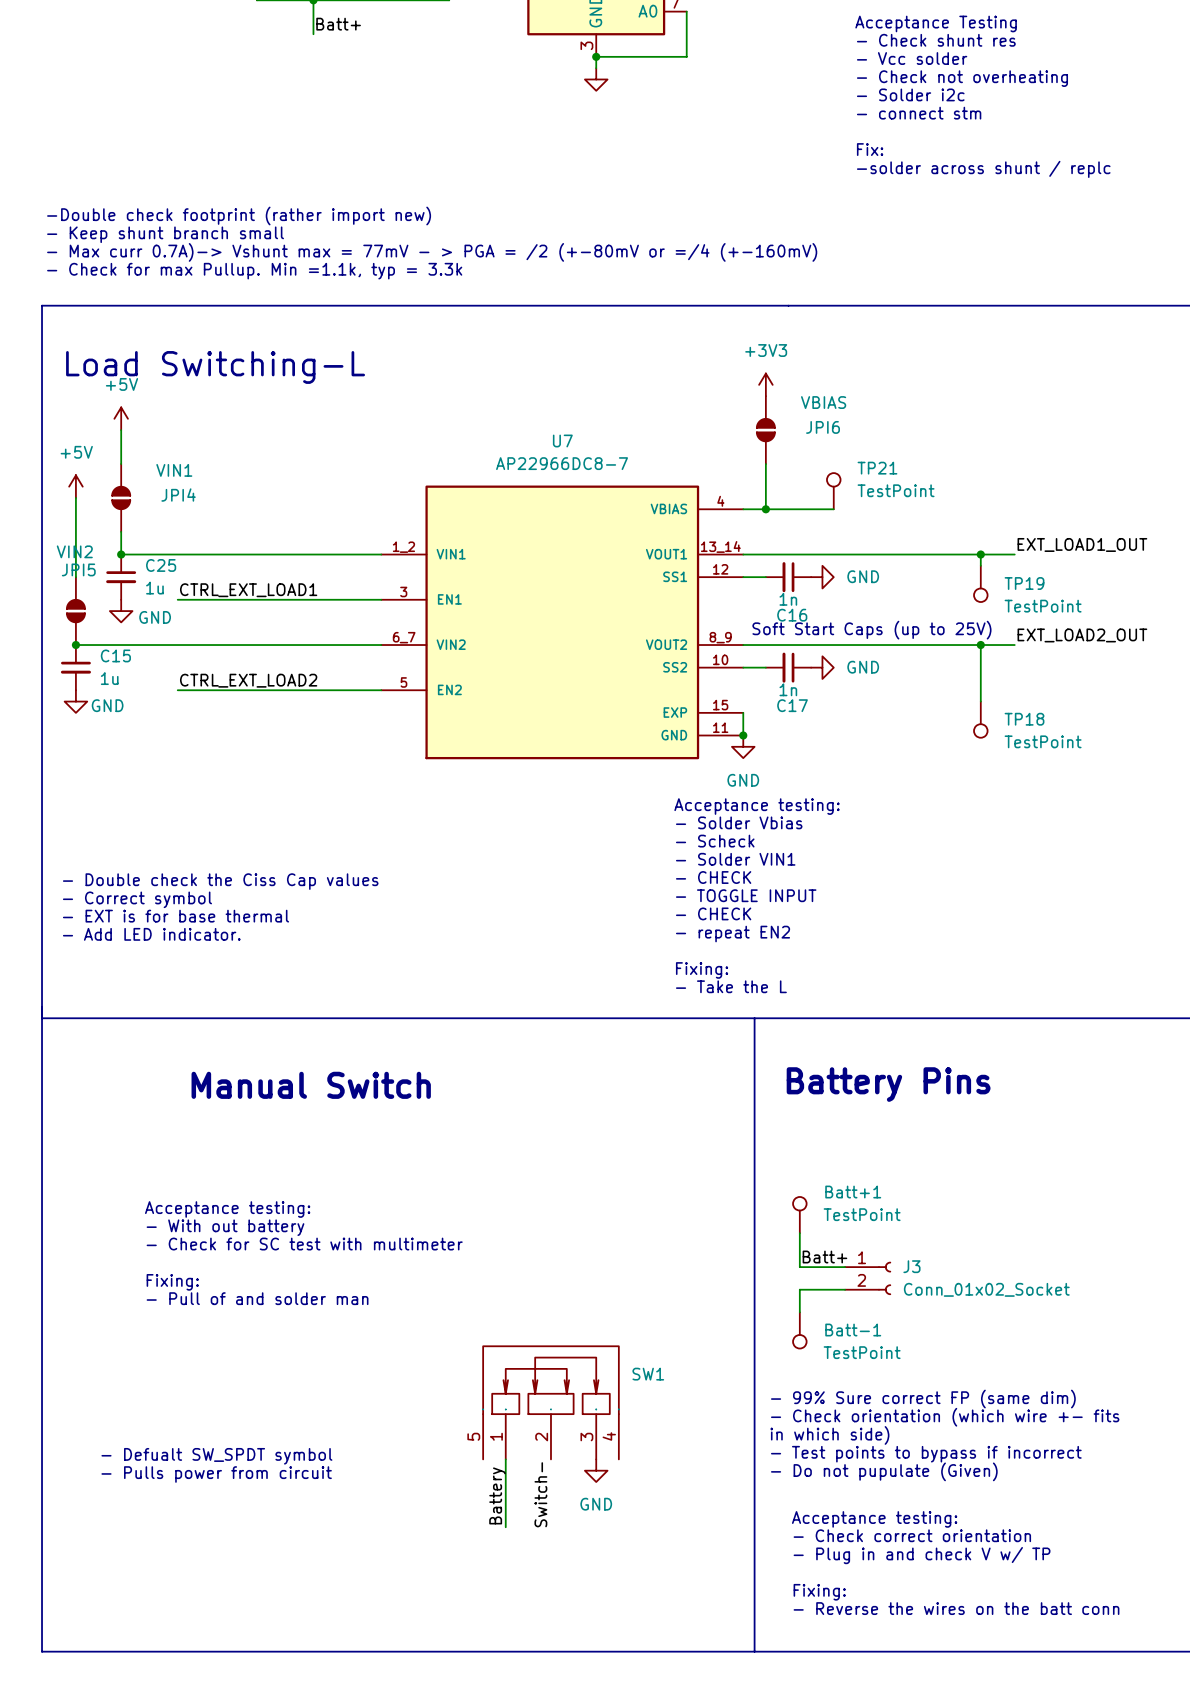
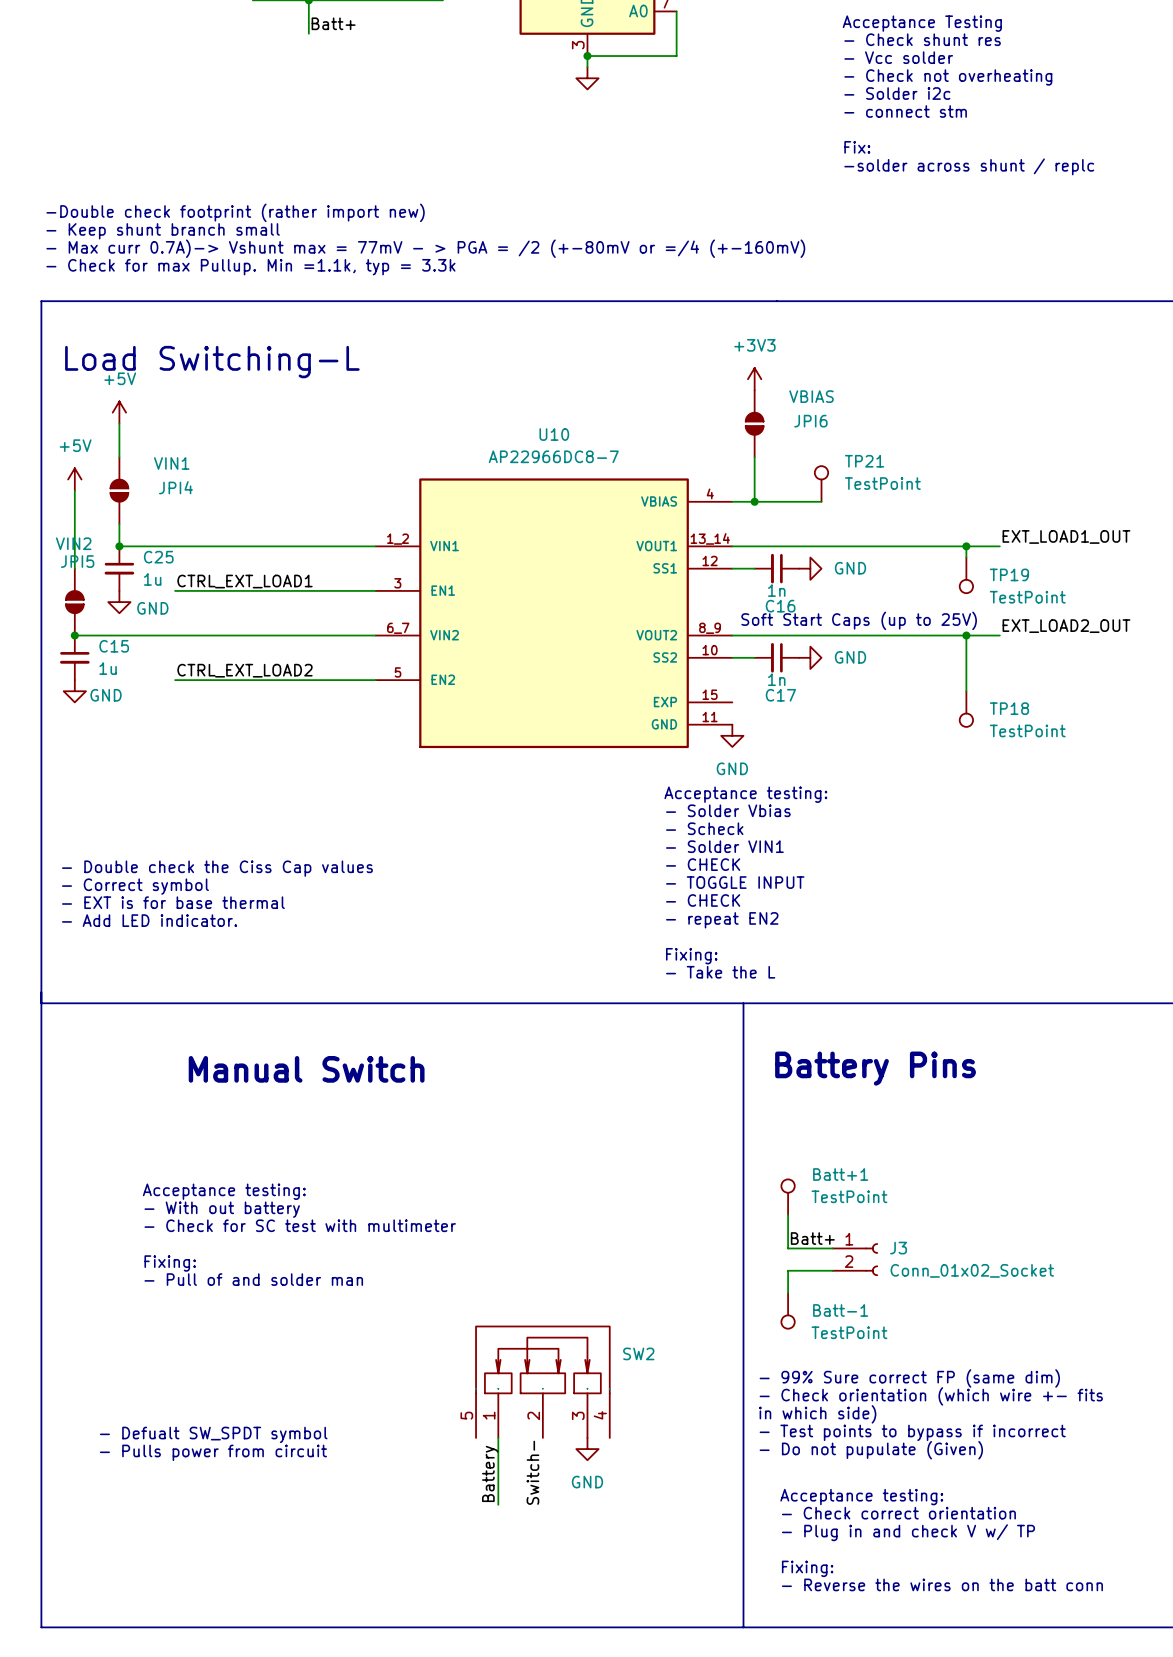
U7 name: U7 (562, 440) -> U10 (554, 434)
wire: (743, 712) (743, 735) -> none
junction: (743, 735) -> none
SW1 name: SW1 (648, 1374) -> SW2 (638, 1353)

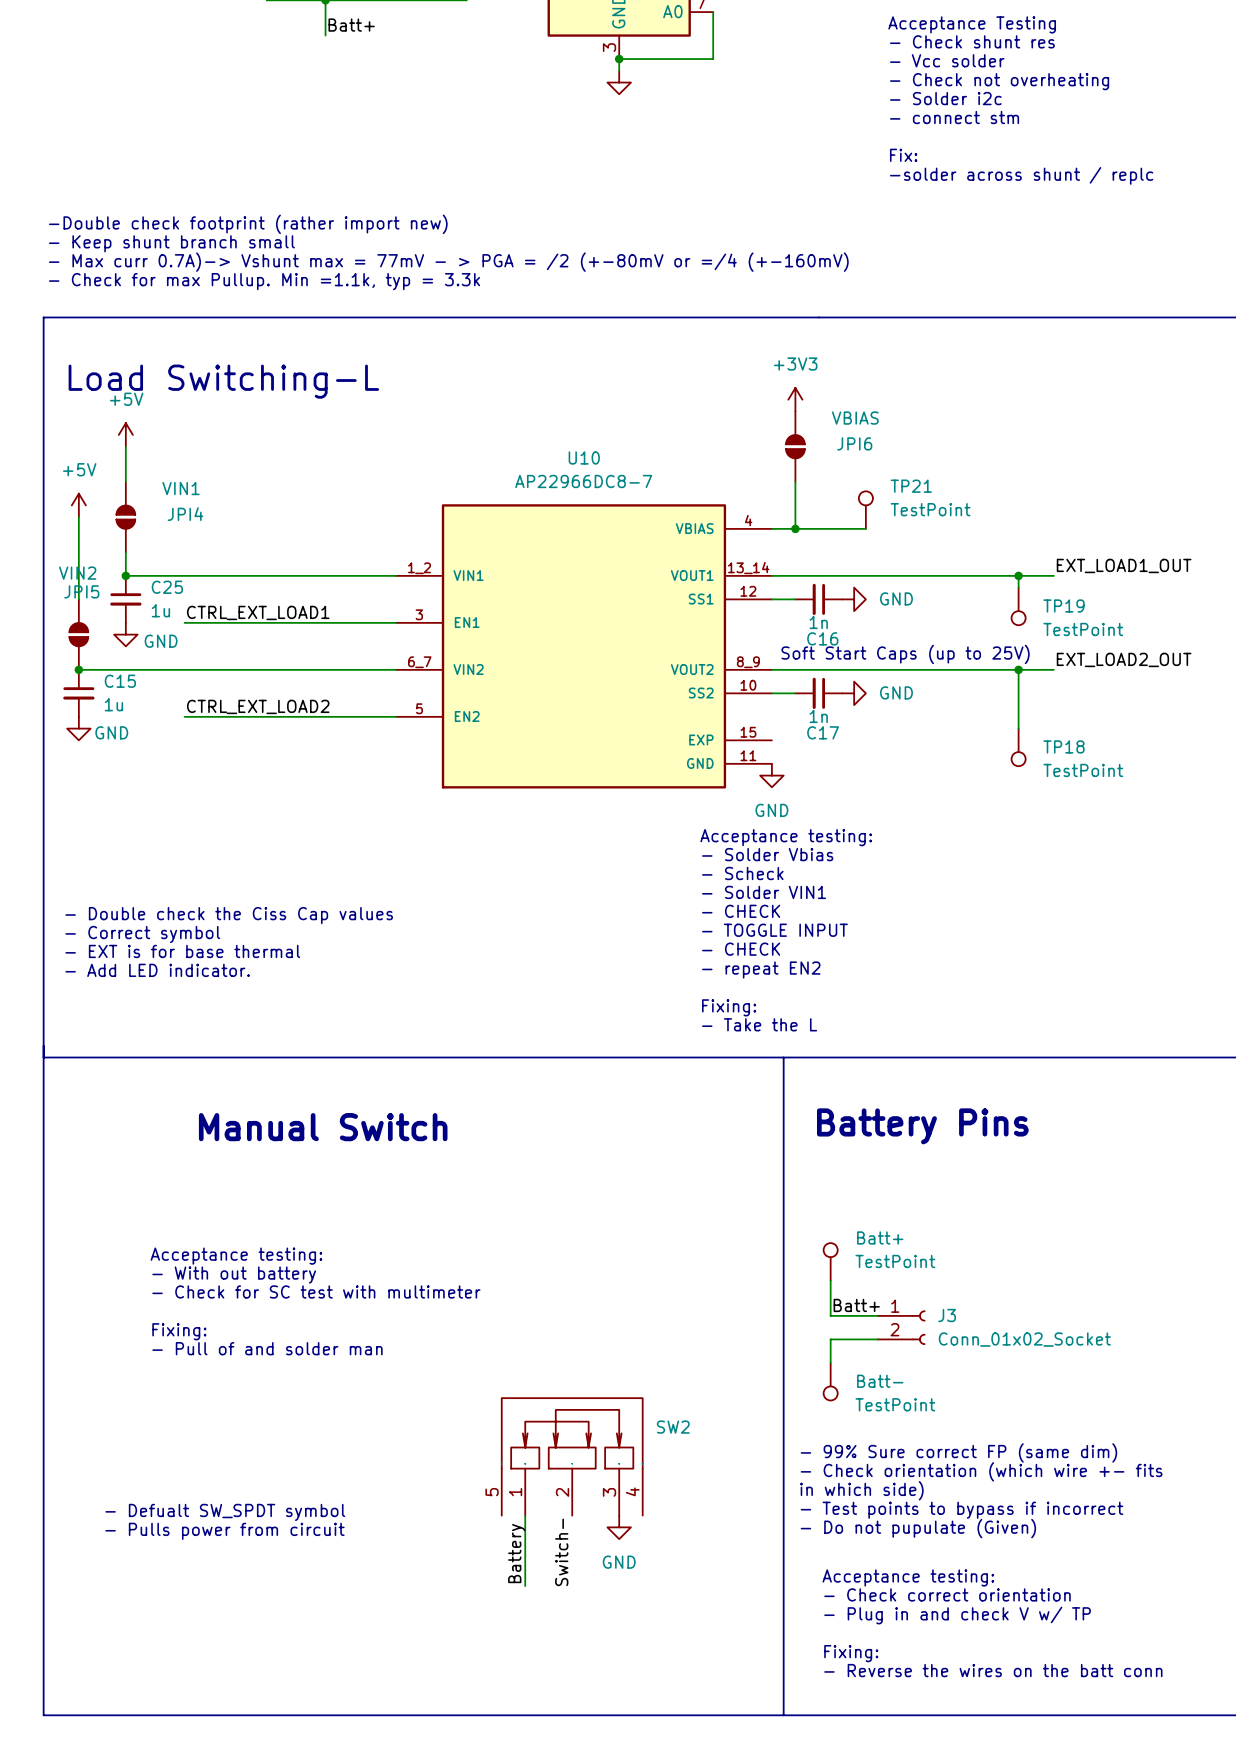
Batt+1 name: Batt+1 (840, 1174) -> Batt+ (880, 1237)
Batt-1 name: Batt-1 (840, 1310) -> Batt- (880, 1381)

